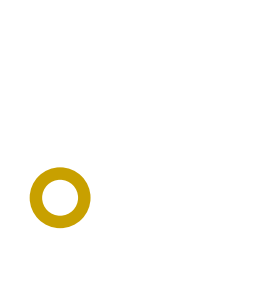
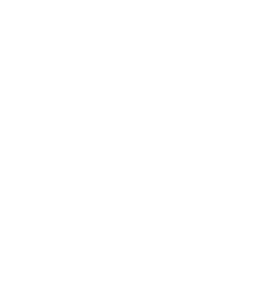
part: (60, 197) -> none

